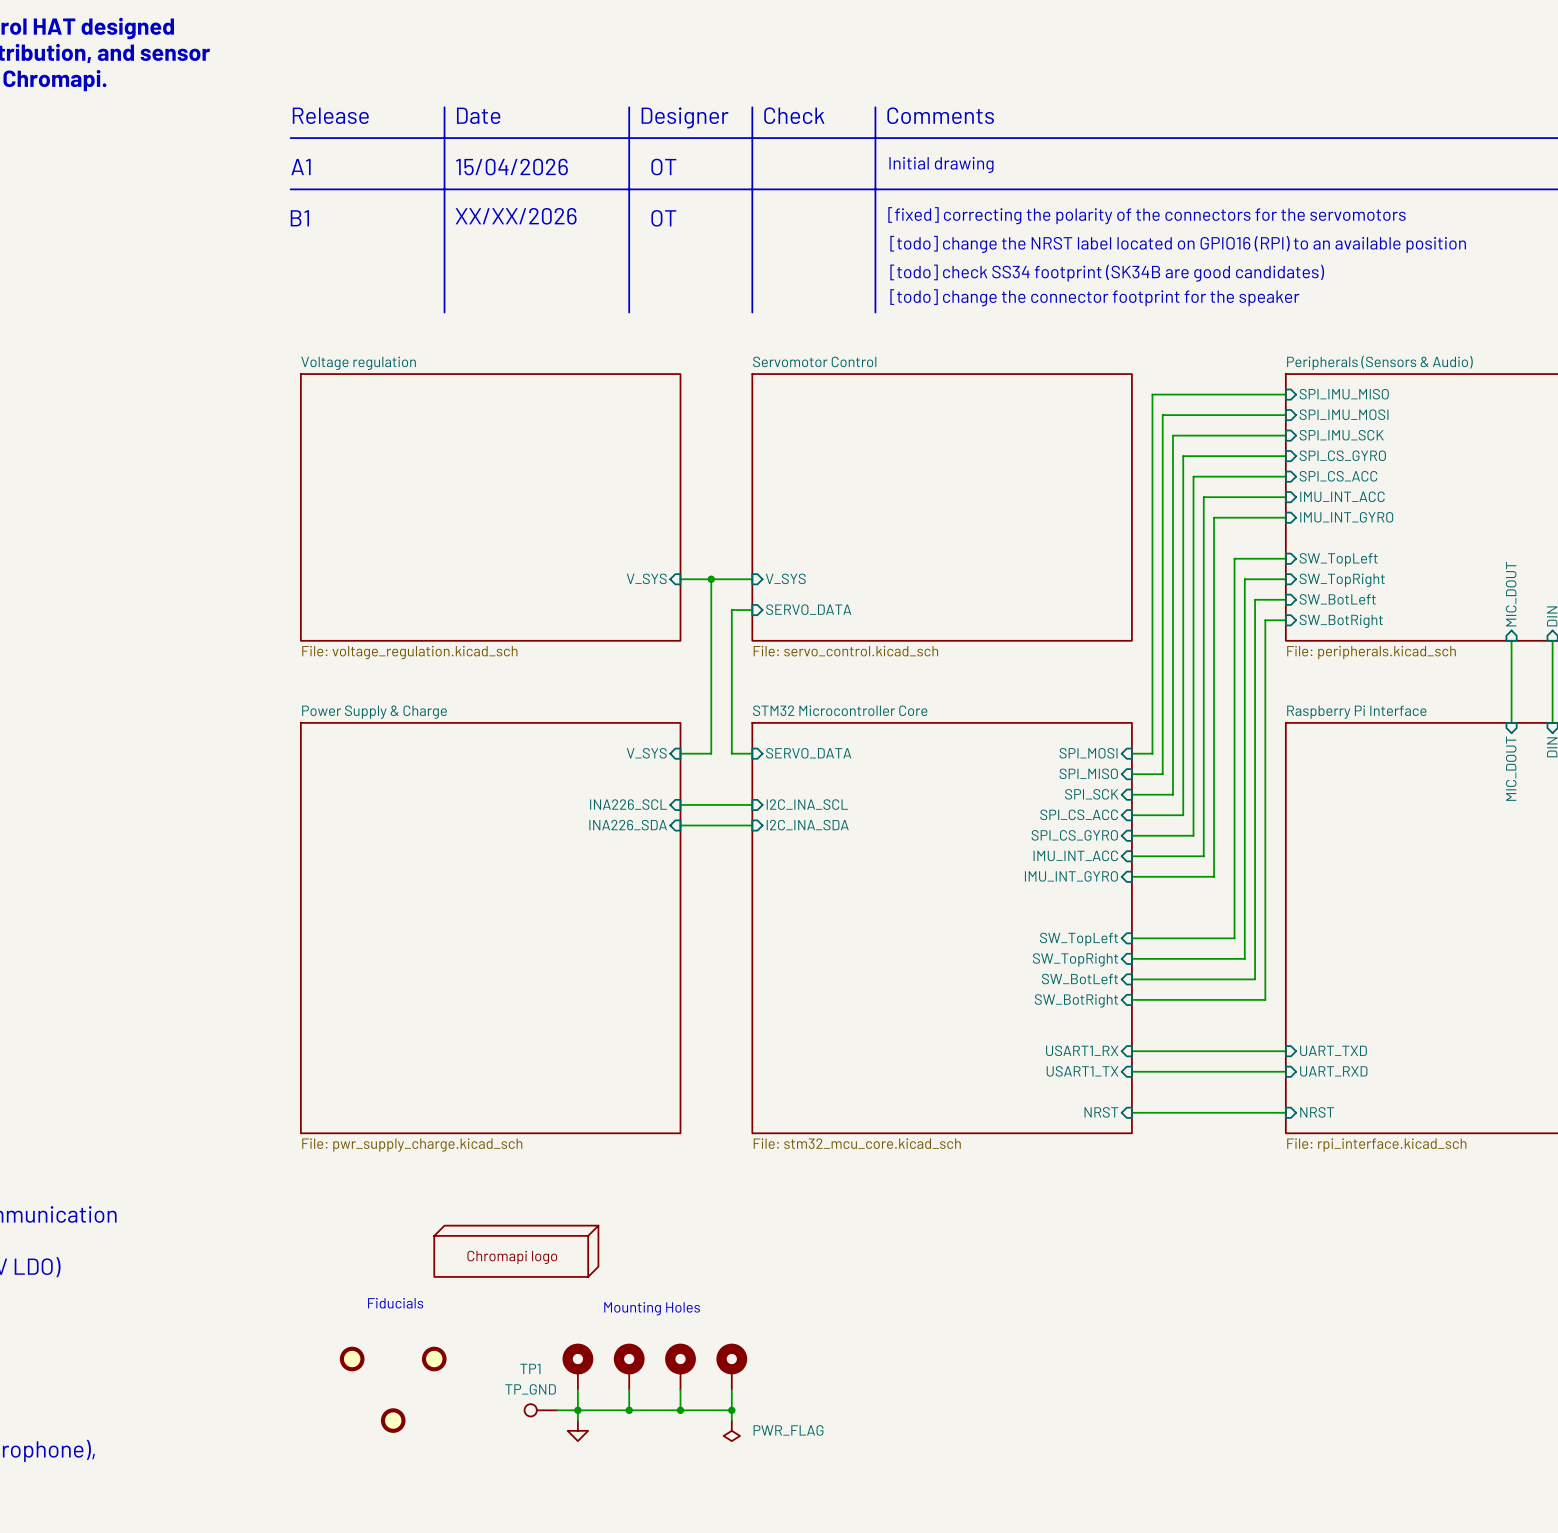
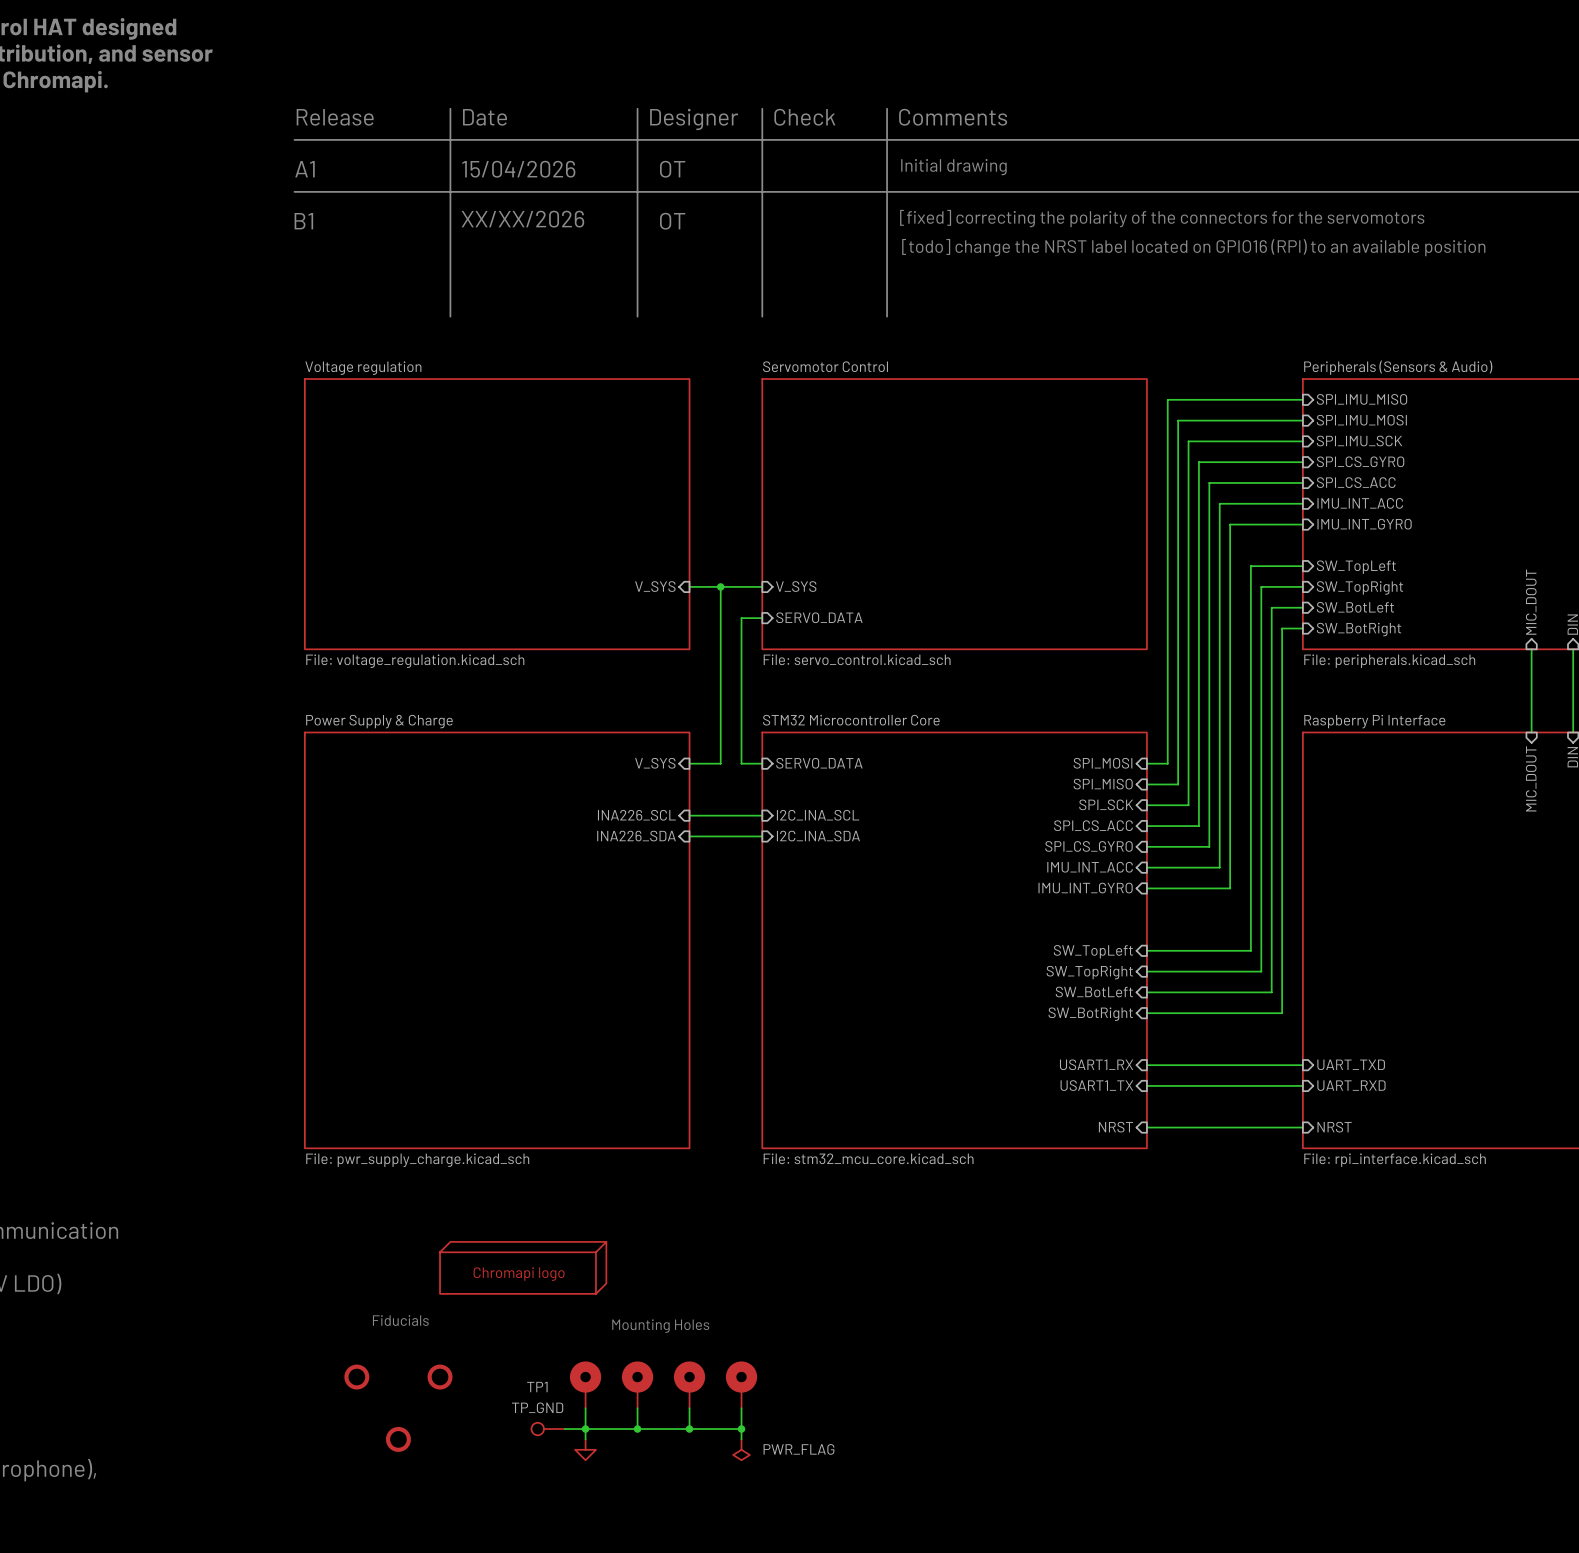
text: [todo] check SS34 footprint (SK34B are good candidates) (1107, 273) -> none
text: [todo] change the connector footprint for the speaker (1094, 297) -> none

